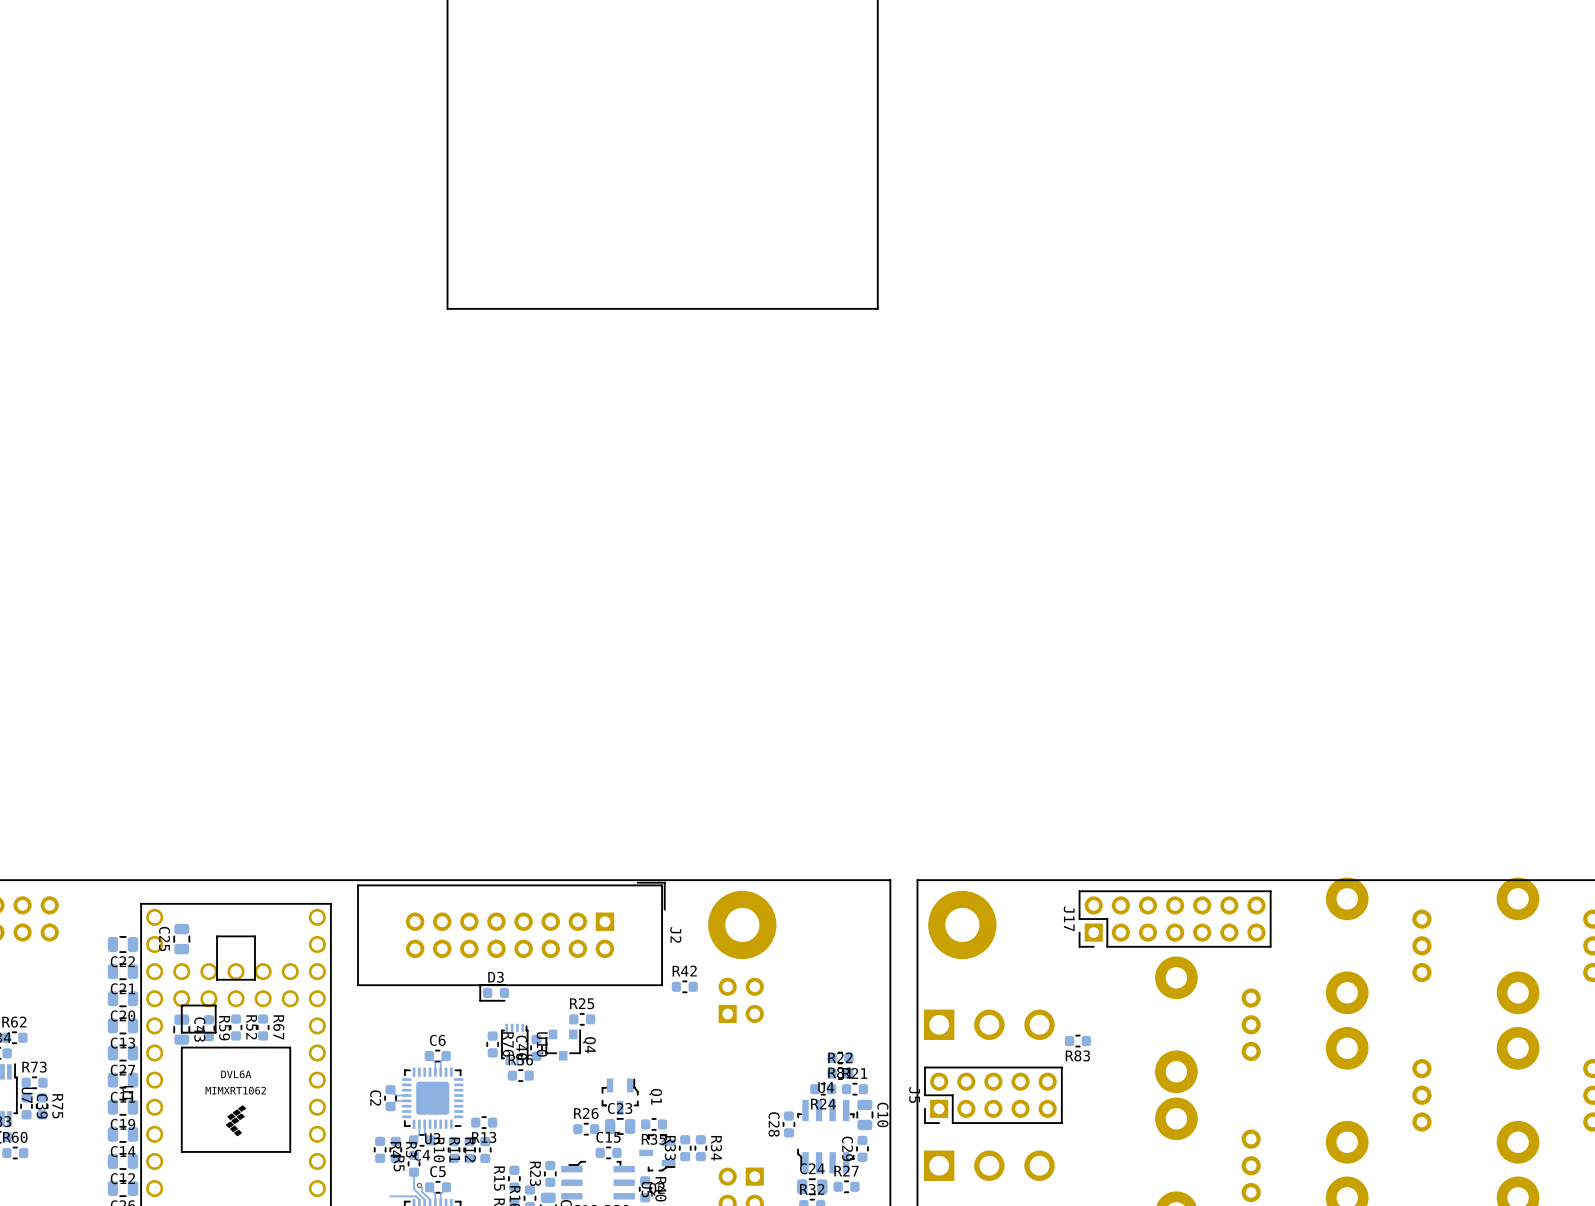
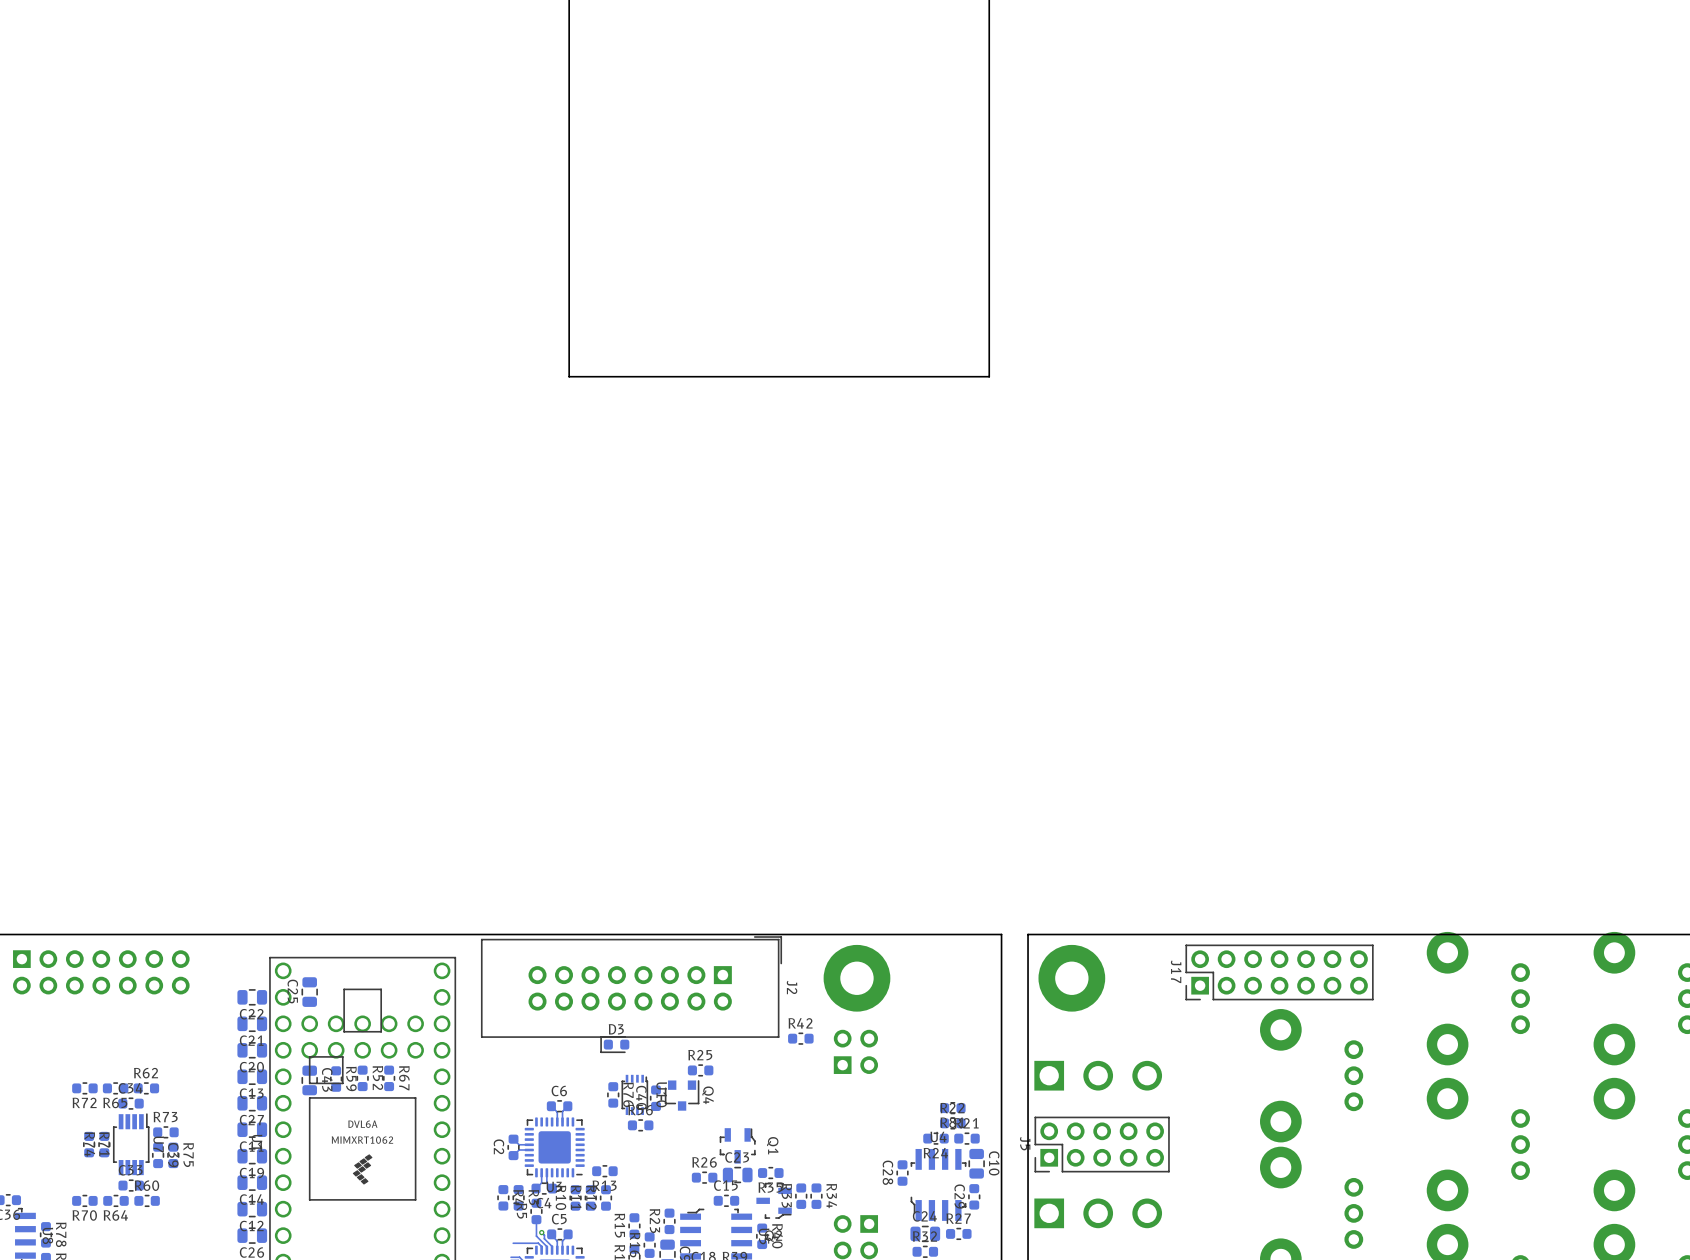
R83: (1077, 1041) -> none

